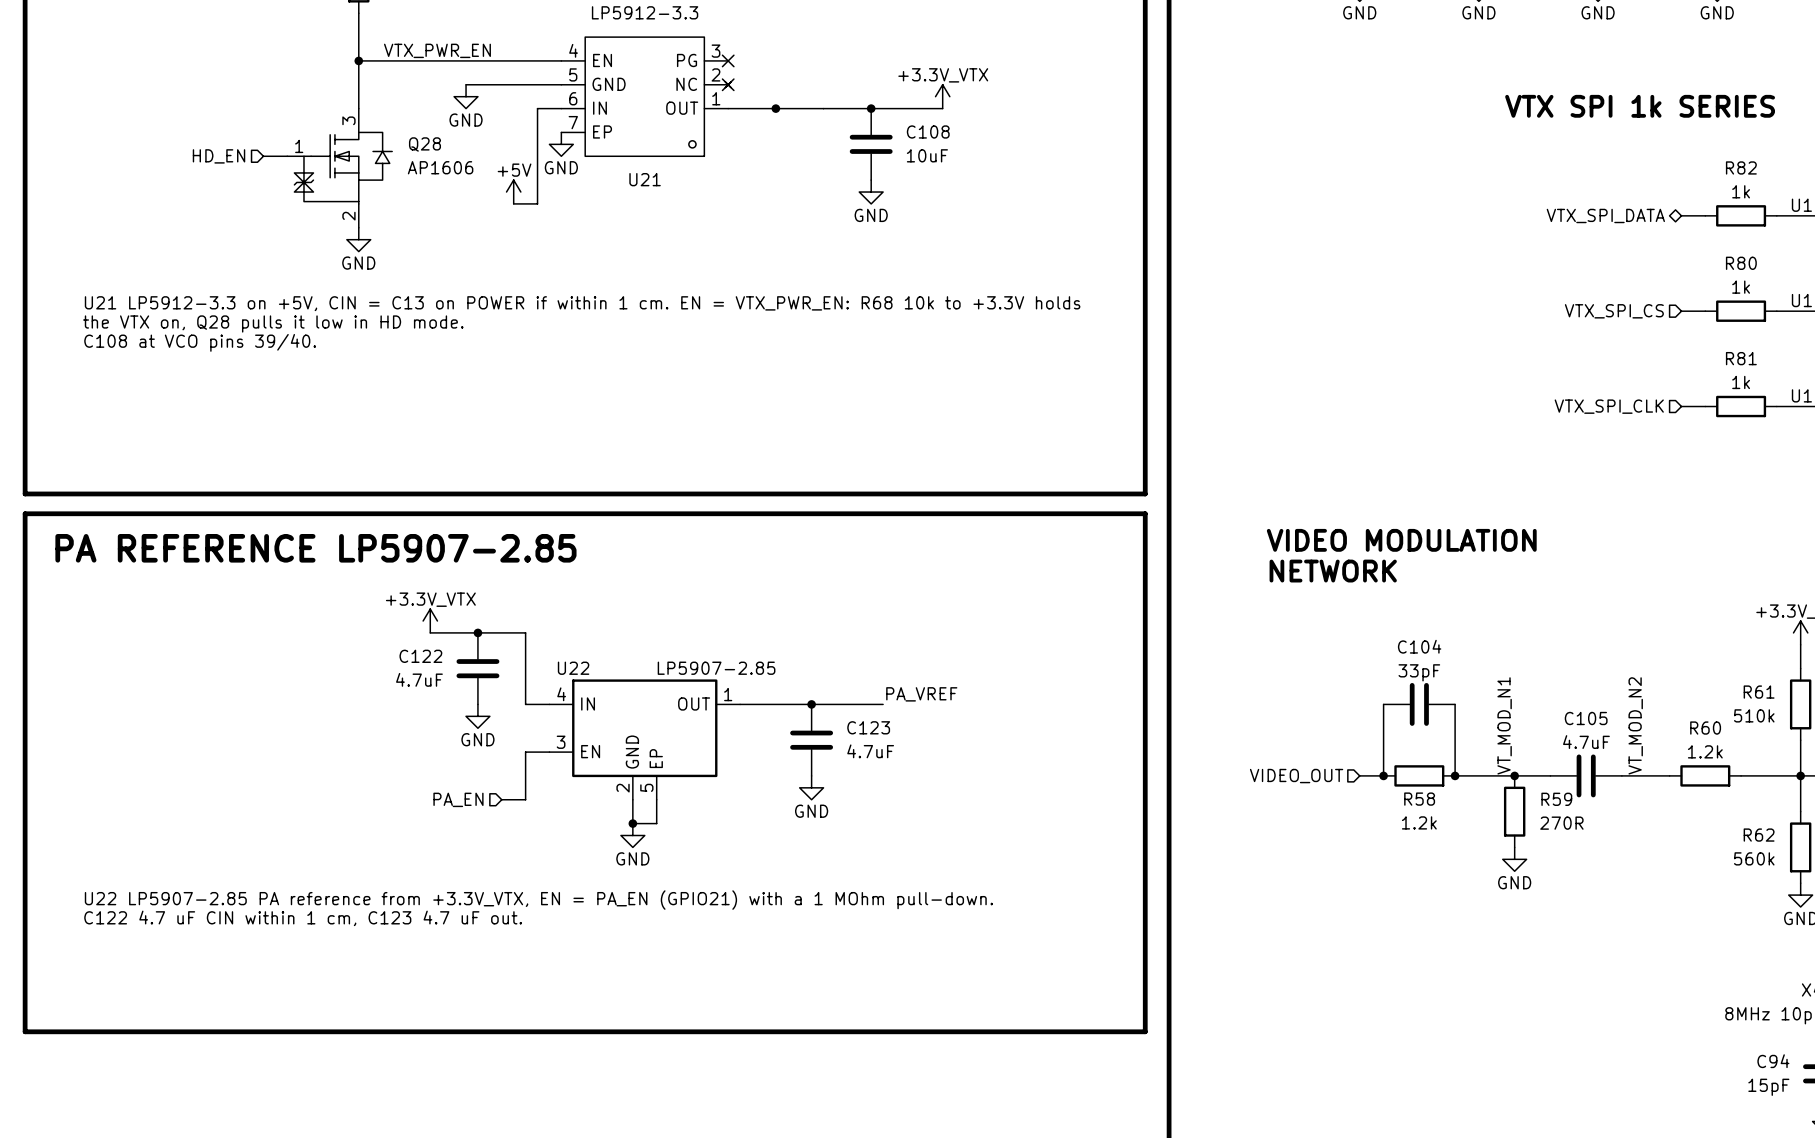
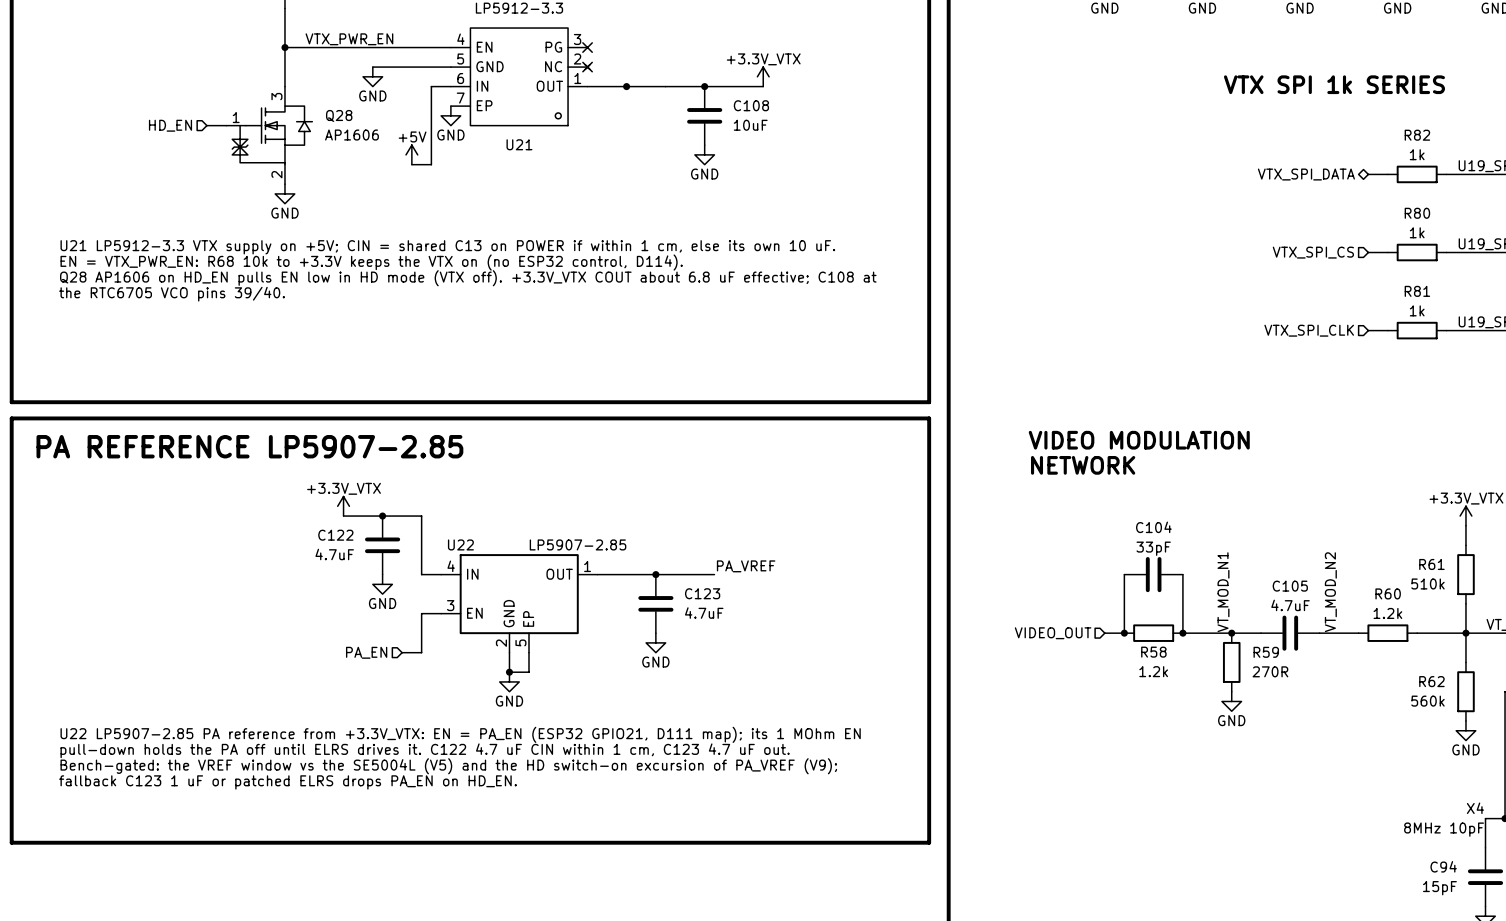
text: U21 LP5912-3.3 on +5V, CIN = C13 on POWER if within 1 cm. EN = VTX_PWR_EN: R68 10k to +3.3V holds (582, 303) -> U21 LP5912-3.3 VTX supply on +5V; CIN = shared C13 on POWER if within 1 cm, else its own 10 uF. (447, 247)
text: the VTX on, Q28 pulls it low in HD mode. (273, 323) -> EN = VTX_PWR_EN: R68 10k to +3.3V keeps the VTX on (no ESP32 control, D114). (371, 262)
text: C108 at VCO pins 39/40. (200, 342) -> Q28 AP1606 on HD_EN pulls EN low in HD mode (VTX off). +3.3V_VTX COUT about 6.8 uF effective; C108 at (468, 278)
text: none -> the RTC6705 VCO pins 39/40. (172, 294)
text: U22 LP5907-2.85 PA reference from +3.3V_VTX, EN = PA_EN (GPIO21) with a 1 MOhm pull-down. (538, 900) -> U22 LP5907-2.85 PA reference from +3.3V_VTX: EN = PA_EN (ESP32 GPIO21, D111 map); its 1 MOhm EN (460, 734)
text: C122 4.7 uF CIN within 1 cm, C123 4.7 uF out. (303, 918) -> pull-down holds the PA off until ELRS drives it. C122 4.7 uF CIN within 1 cm, C123 4.7 uF out. (425, 750)
text: none -> Bench-gated: the VREF window vs the SE5004L (V5) and the HD switch-on excursion of PA_VREF (V9); (448, 766)
text: none -> fallback C123 1 uF or patched ELRS drops PA_EN on HD_EN. (287, 782)

